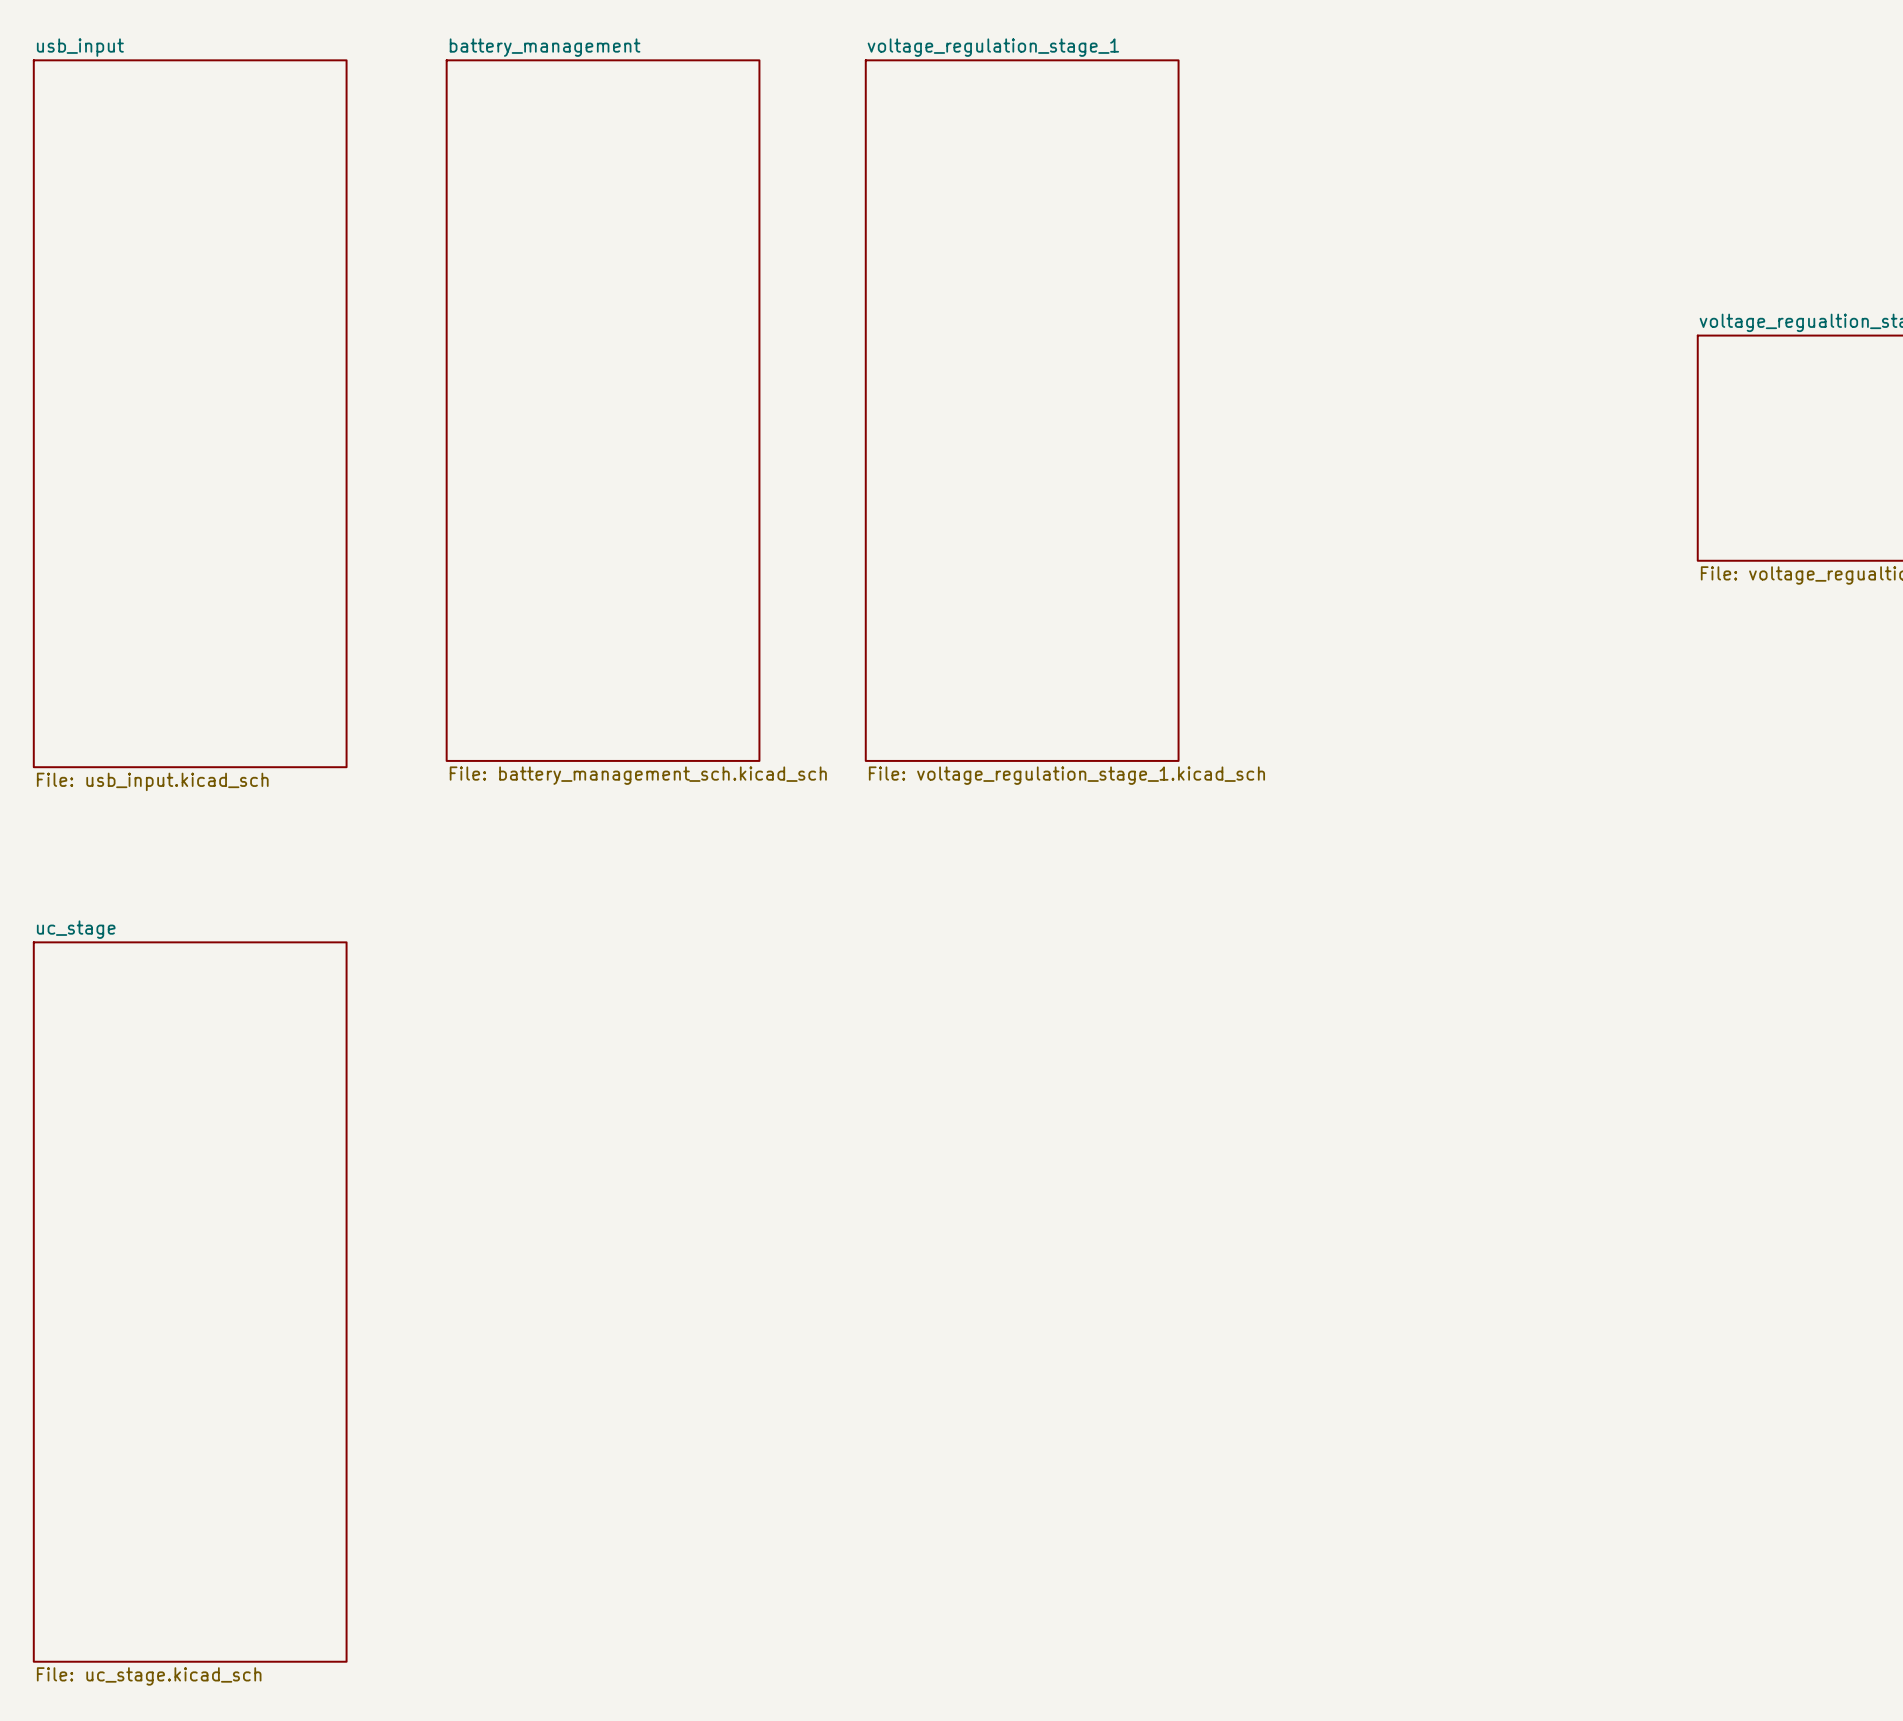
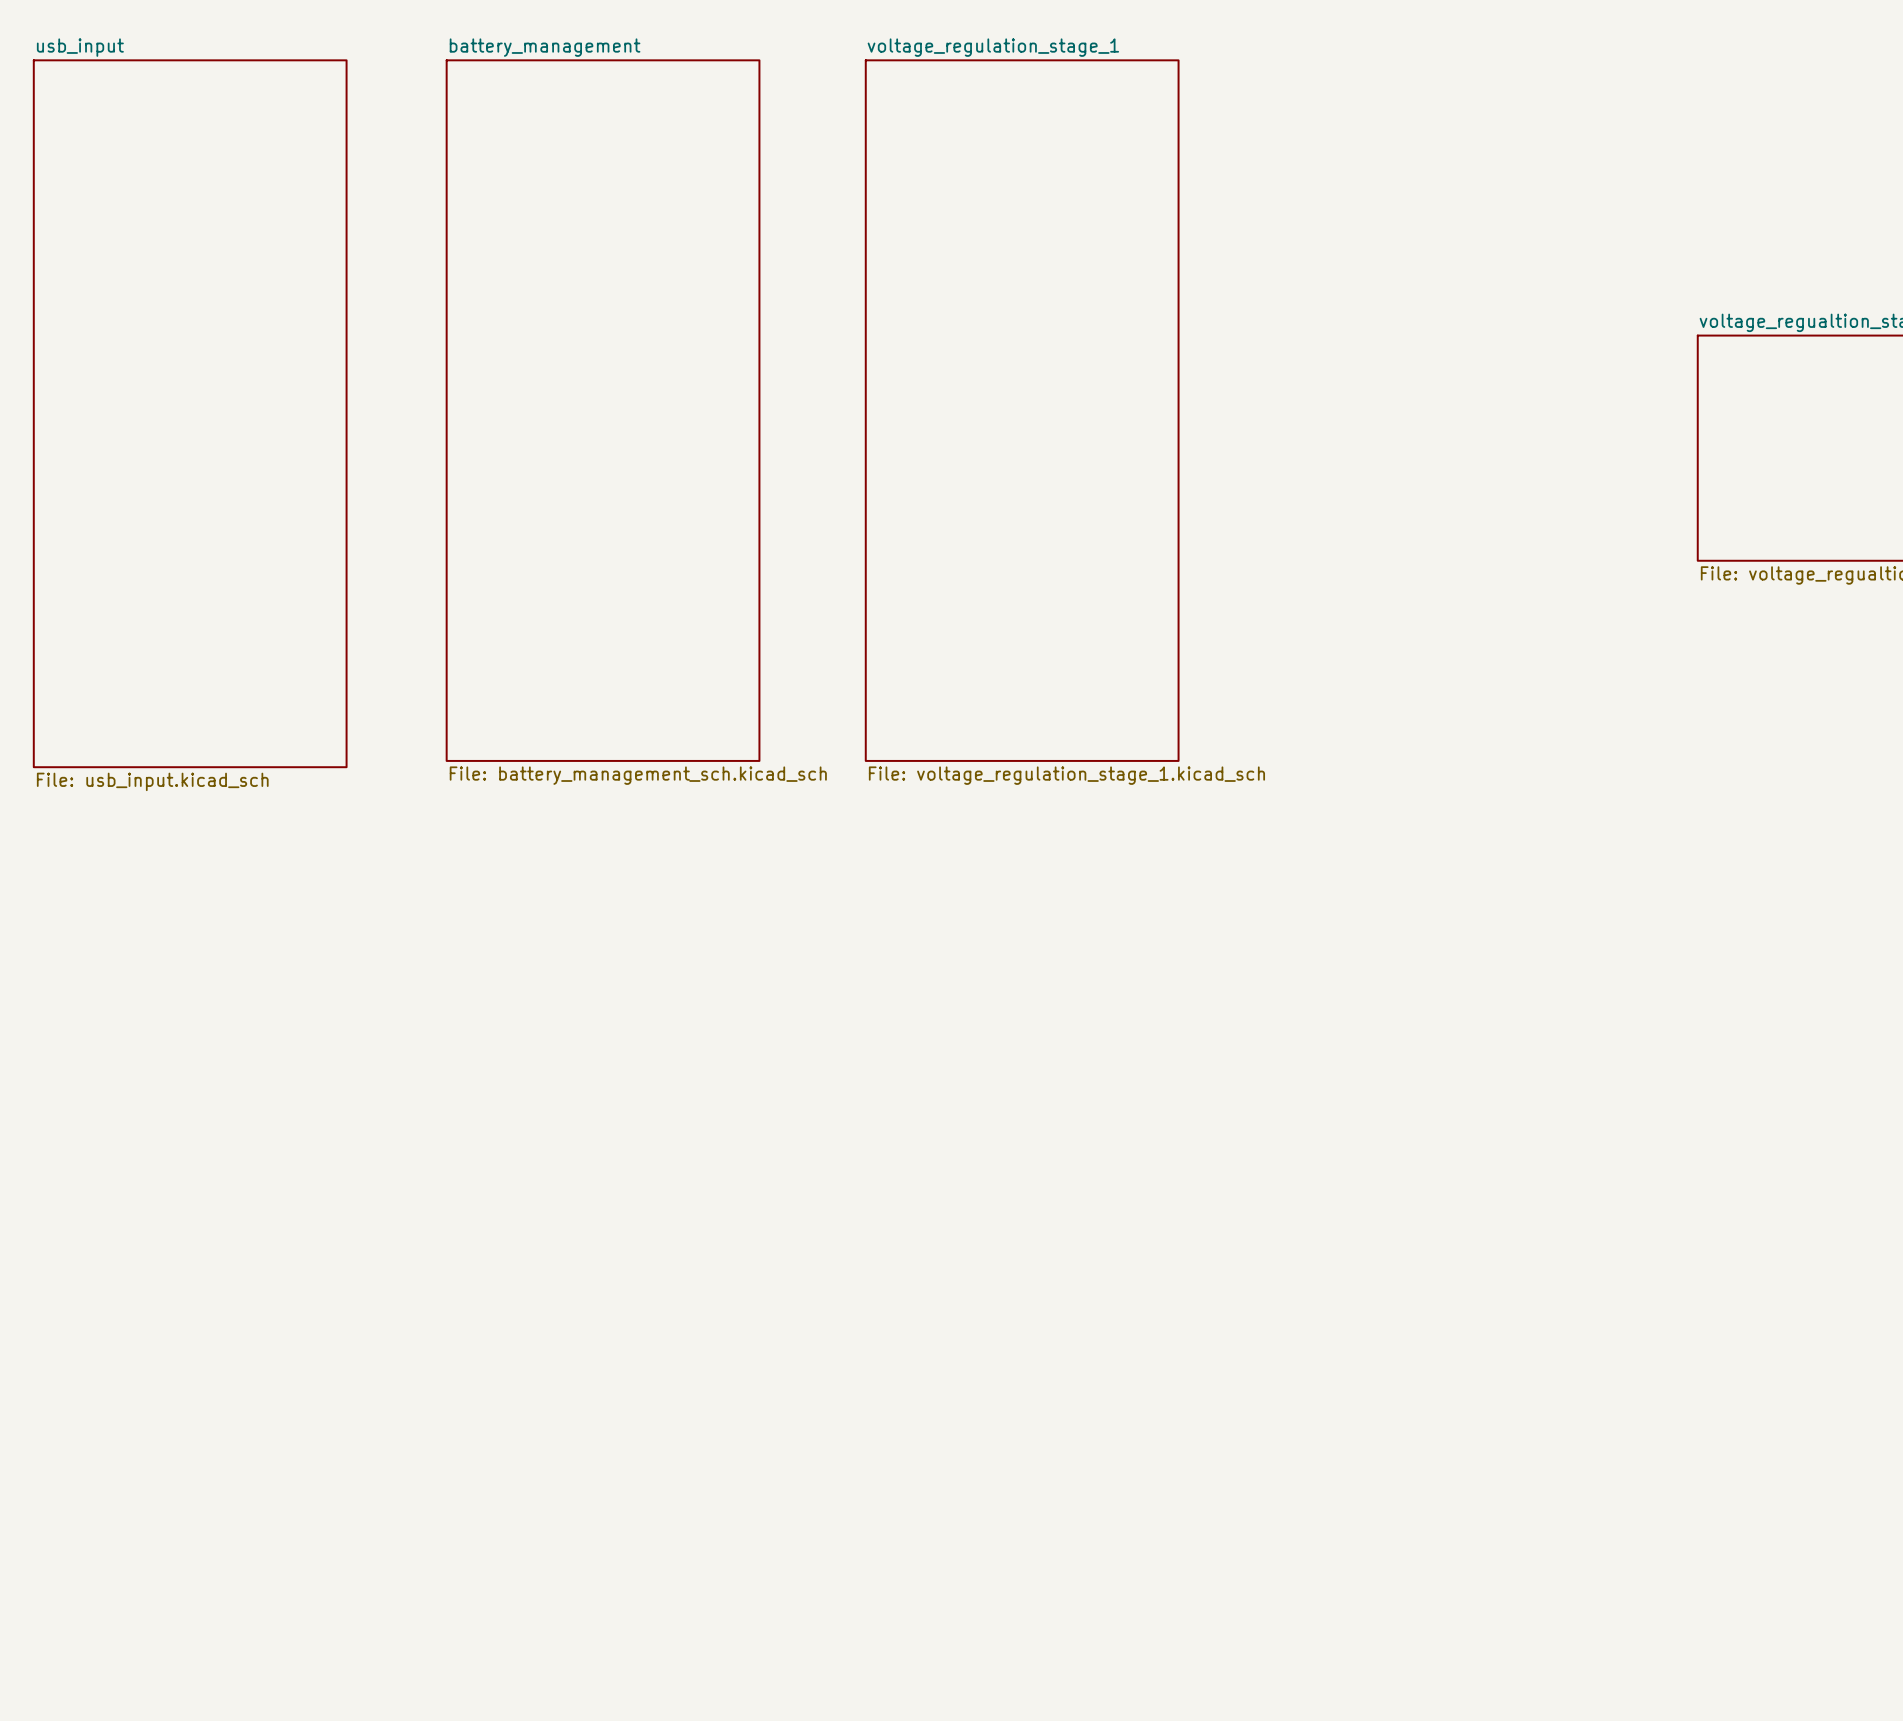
sheet uc_stage: File: uc_stage.kicad_sch (190, 1302) -> none

